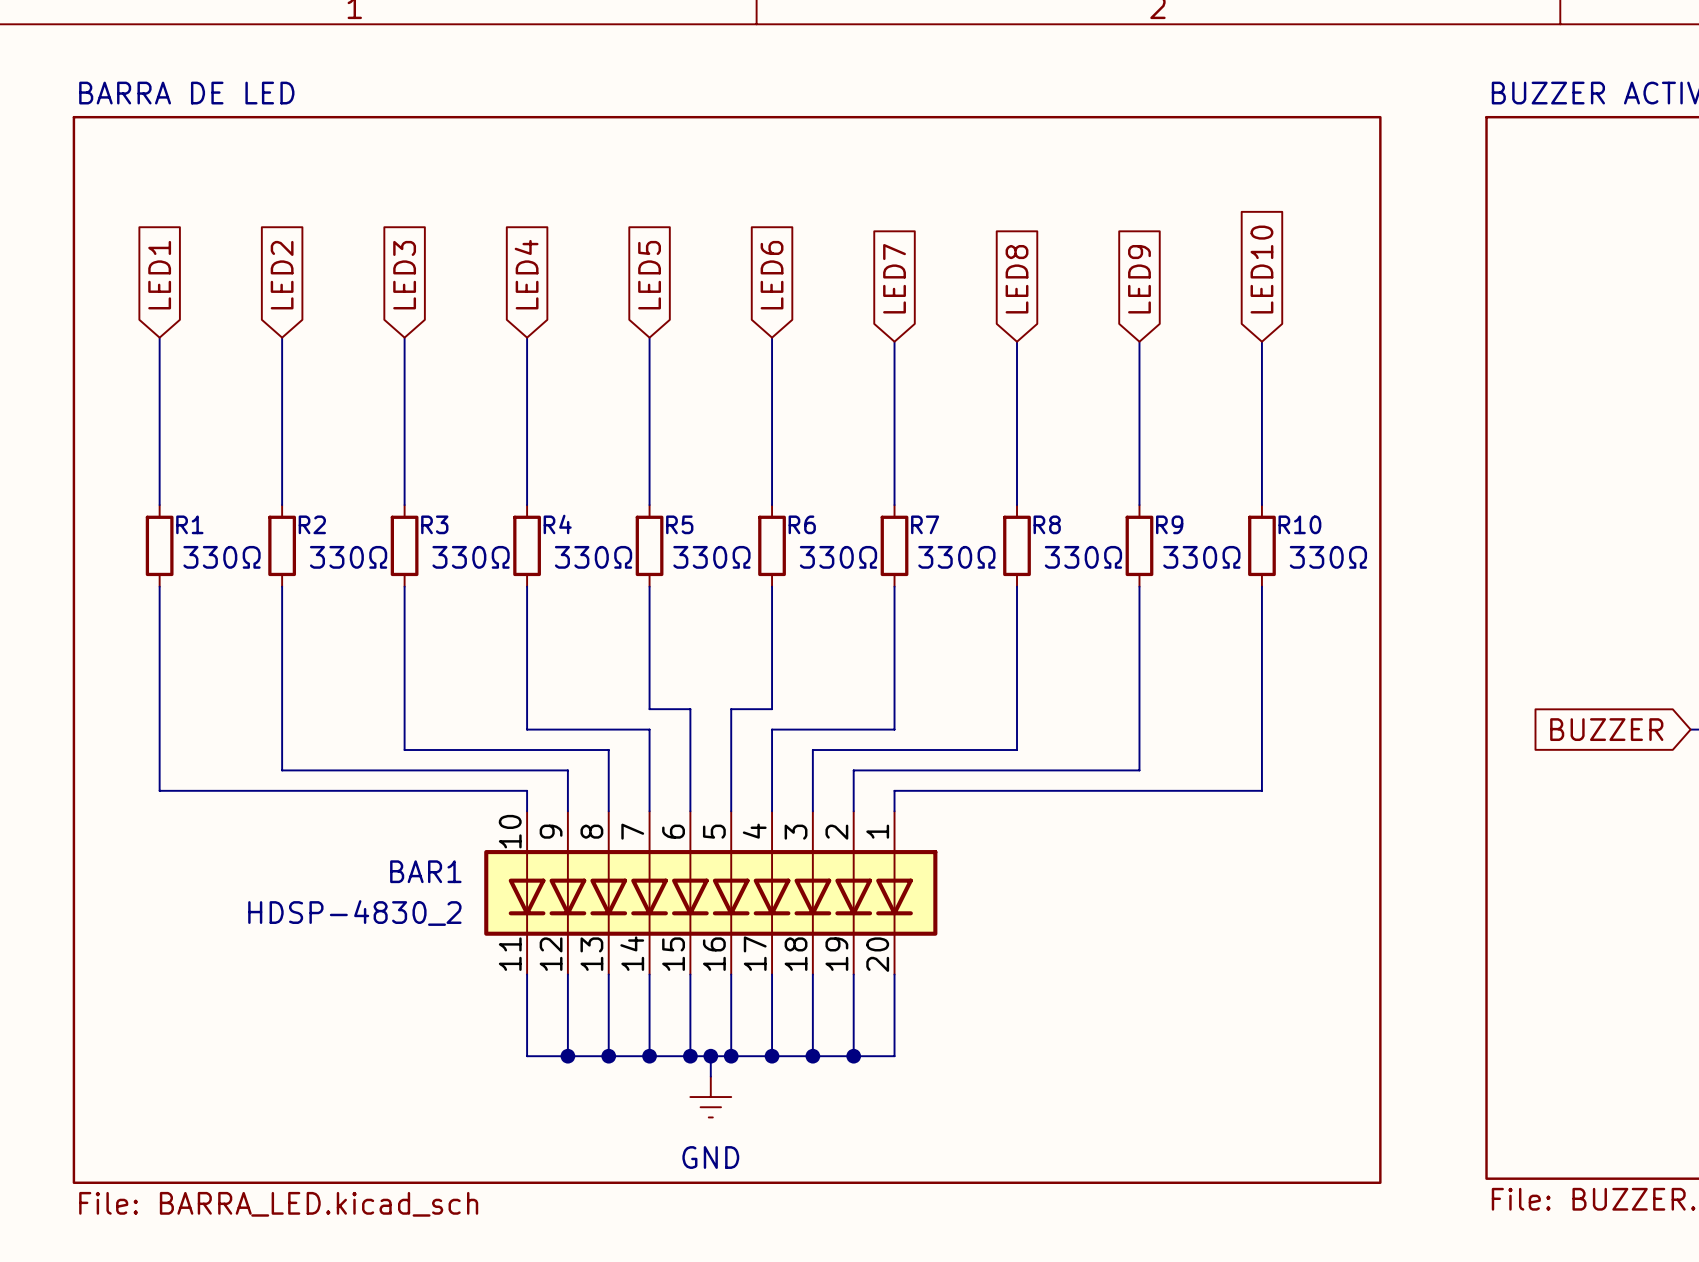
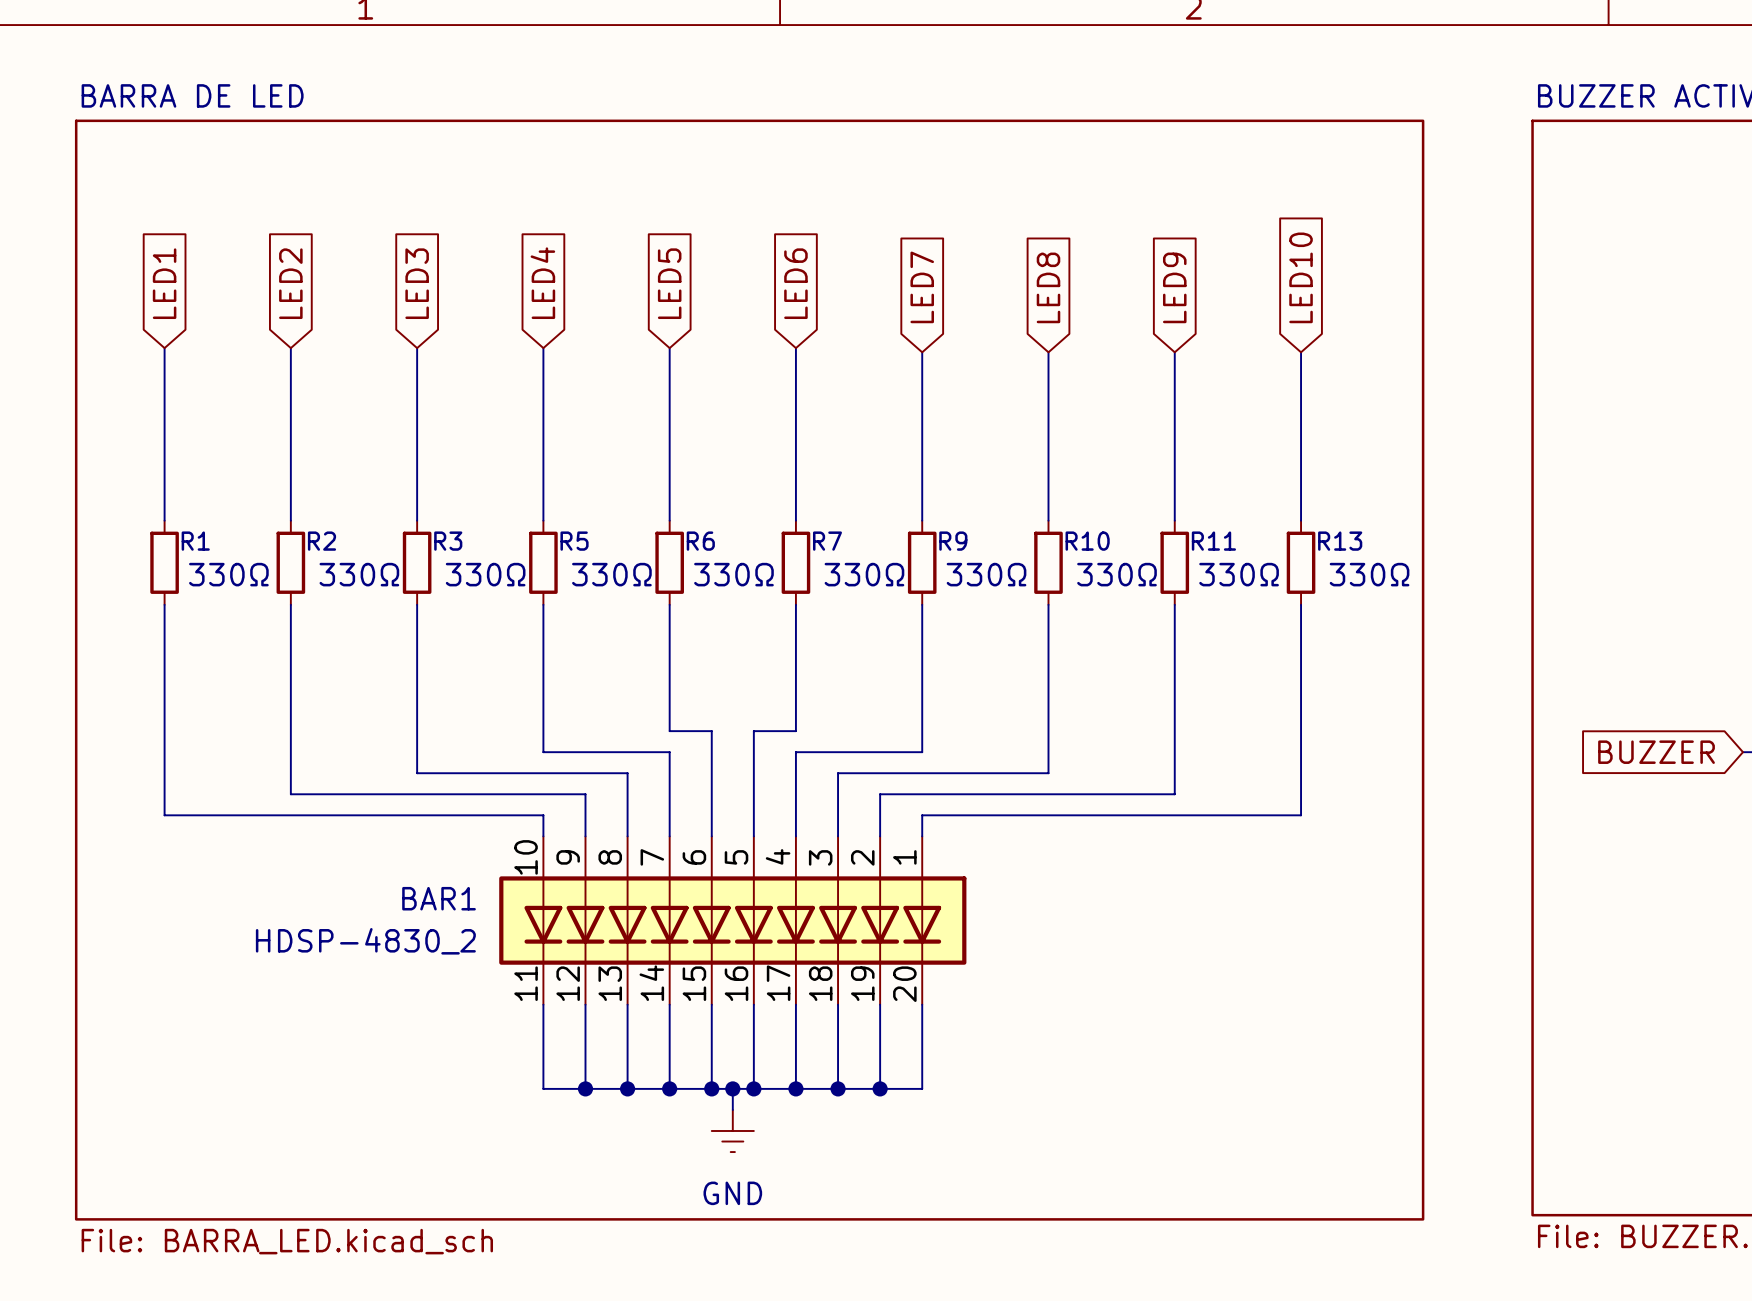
R4 name: R4 (557, 524) -> R5 (574, 541)
R5 name: R5 (679, 524) -> R6 (700, 541)
R6 name: R6 (802, 524) -> R7 (827, 541)
R7 name: R7 (925, 524) -> R9 (953, 541)
R8 name: R8 (1047, 524) -> R10 (1087, 541)
R9 name: R9 (1169, 524) -> R11 (1213, 541)
R10 name: R10 (1299, 524) -> R13 (1340, 541)

